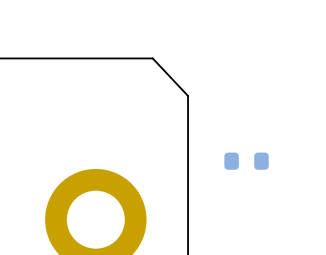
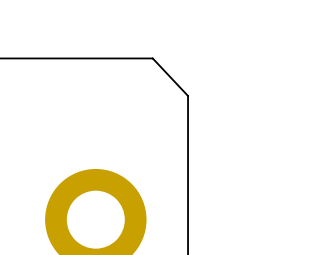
part: (246, 161) -> none

